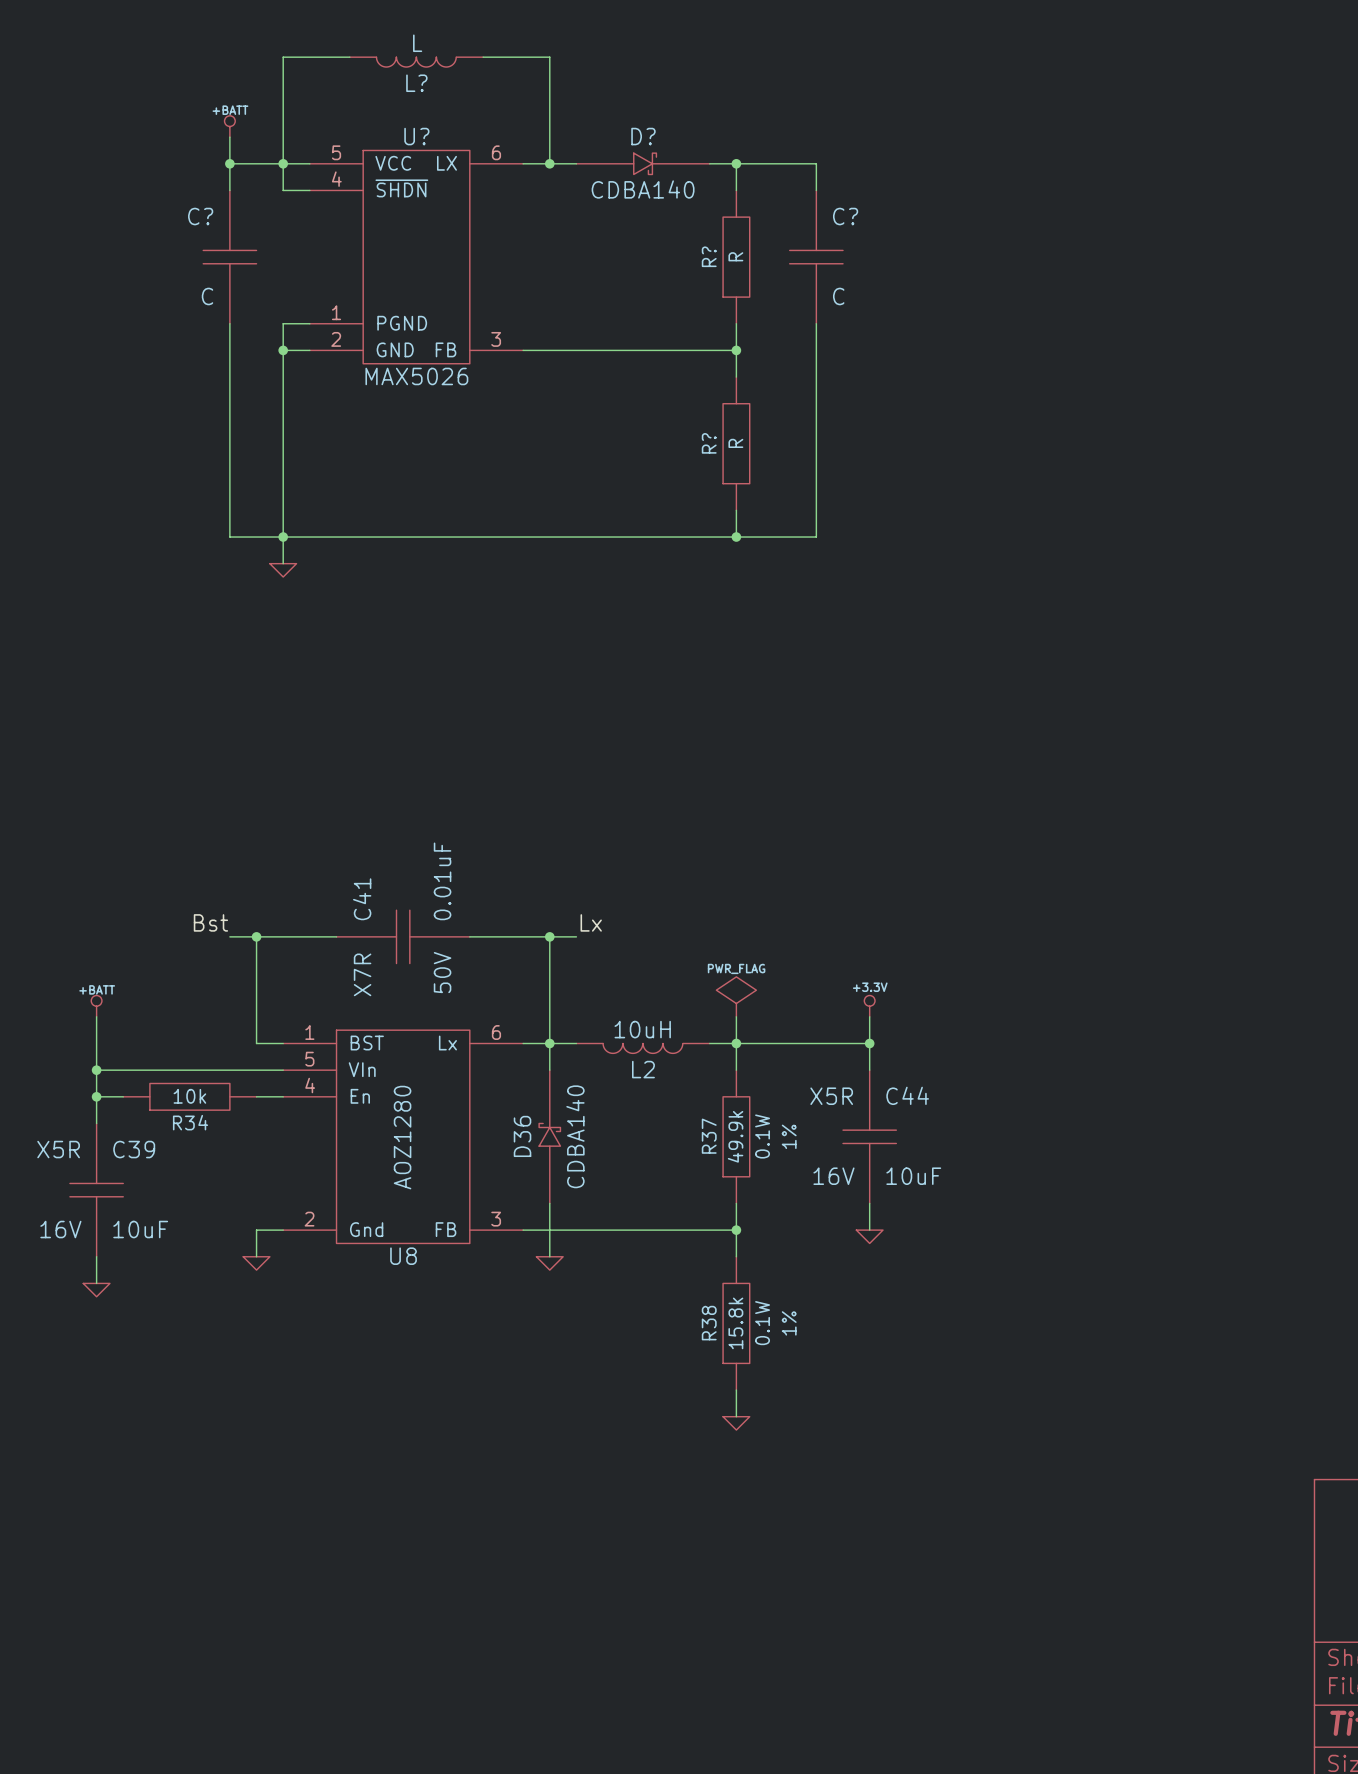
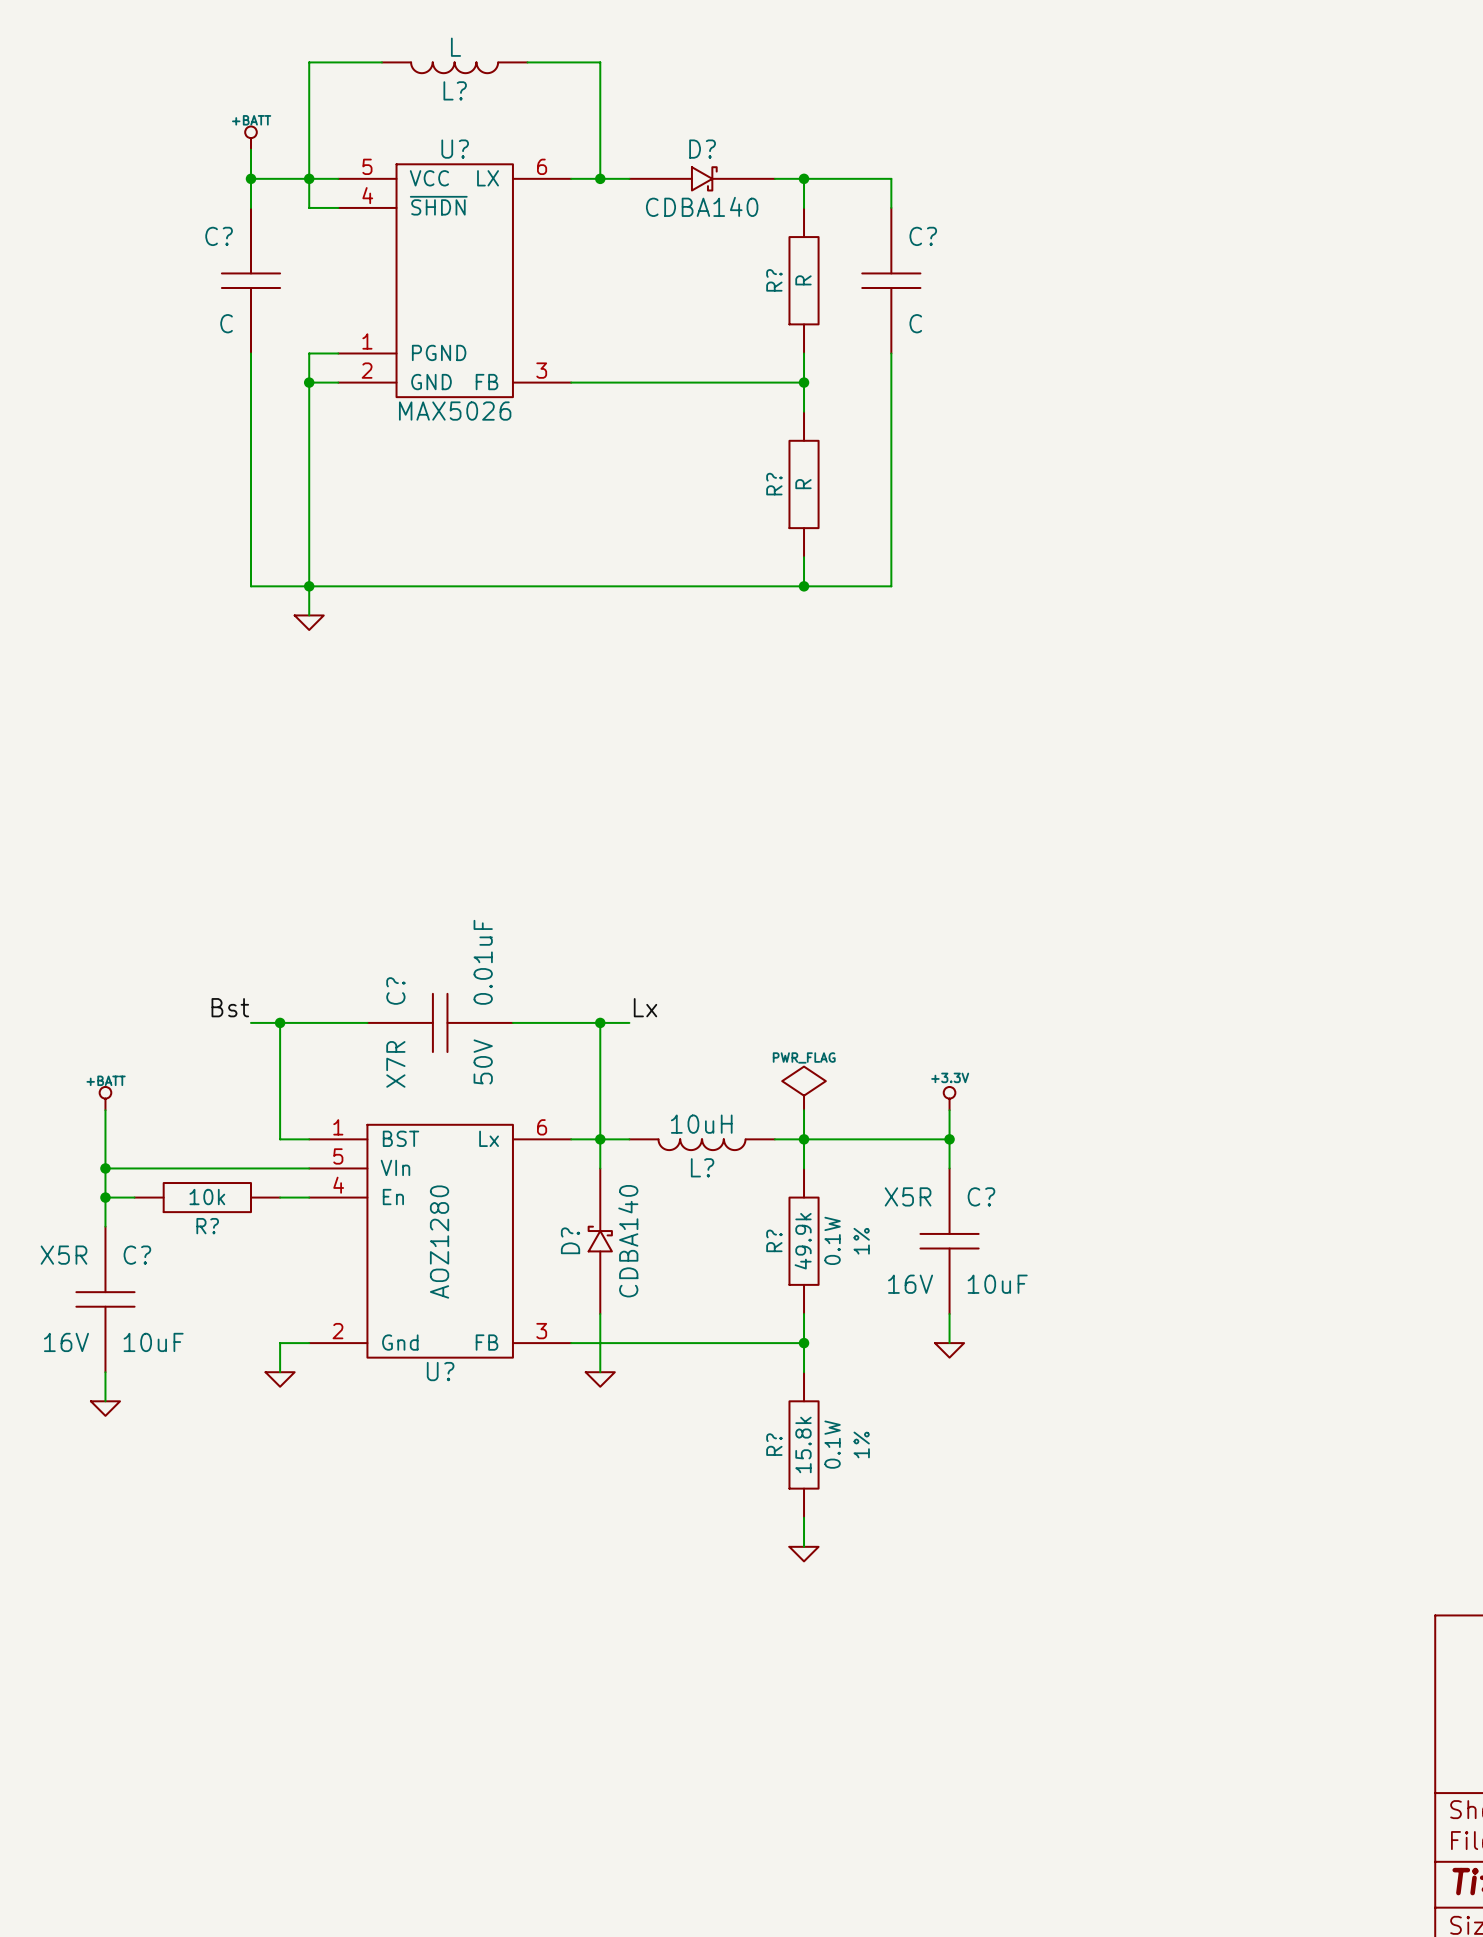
C41 name: C41 (362, 899) -> C? (395, 991)
L2 name: L2 (643, 1069) -> L? (702, 1167)
C44 name: C44 (907, 1095) -> C? (981, 1196)
R34 name: R34 (190, 1122) -> R? (207, 1226)
D36 name: D36 (522, 1136) -> D? (570, 1240)
R37 name: R37 (709, 1136) -> R? (774, 1240)
C39 name: C39 (134, 1149) -> C? (137, 1255)
U8 name: U8 (403, 1256) -> U? (440, 1371)
R38 name: R38 (709, 1323) -> R? (774, 1444)

